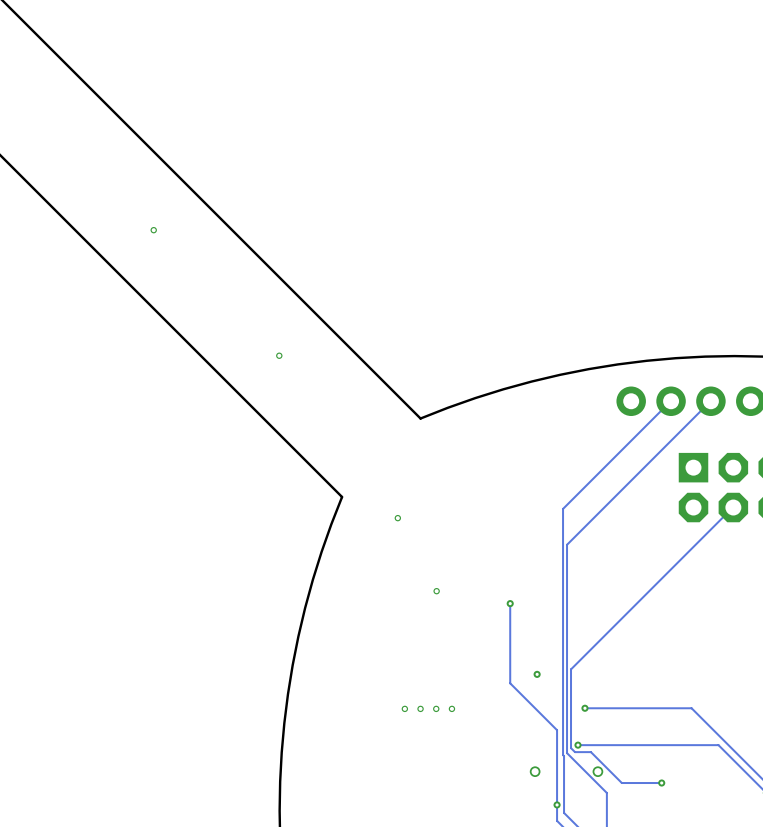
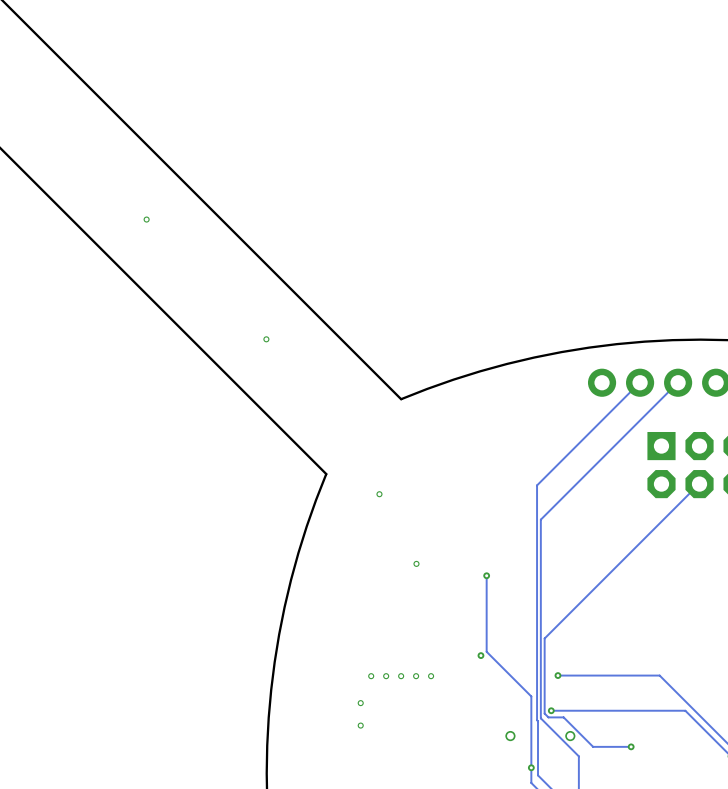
via position: (537, 674) -> (480, 655)
part: none -> (371, 676)
part: none -> (360, 703)
part: none -> (360, 725)

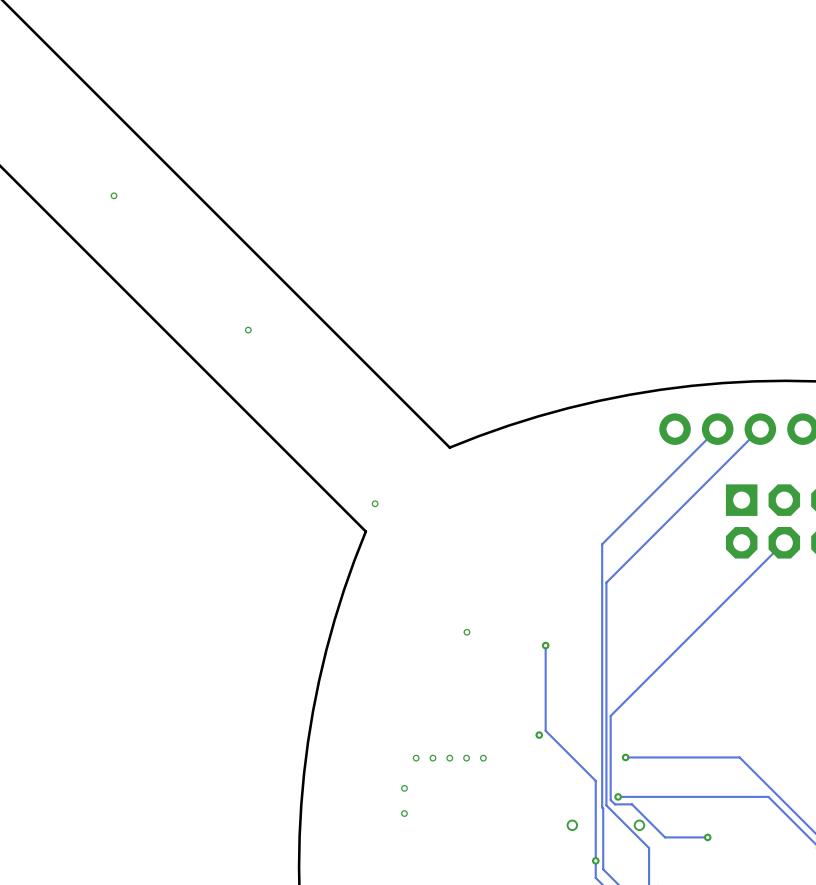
part: none -> (114, 195)
part: (146, 219) -> none
part: none -> (248, 330)
part: (266, 339) -> none
part position: (379, 494) -> (375, 503)

